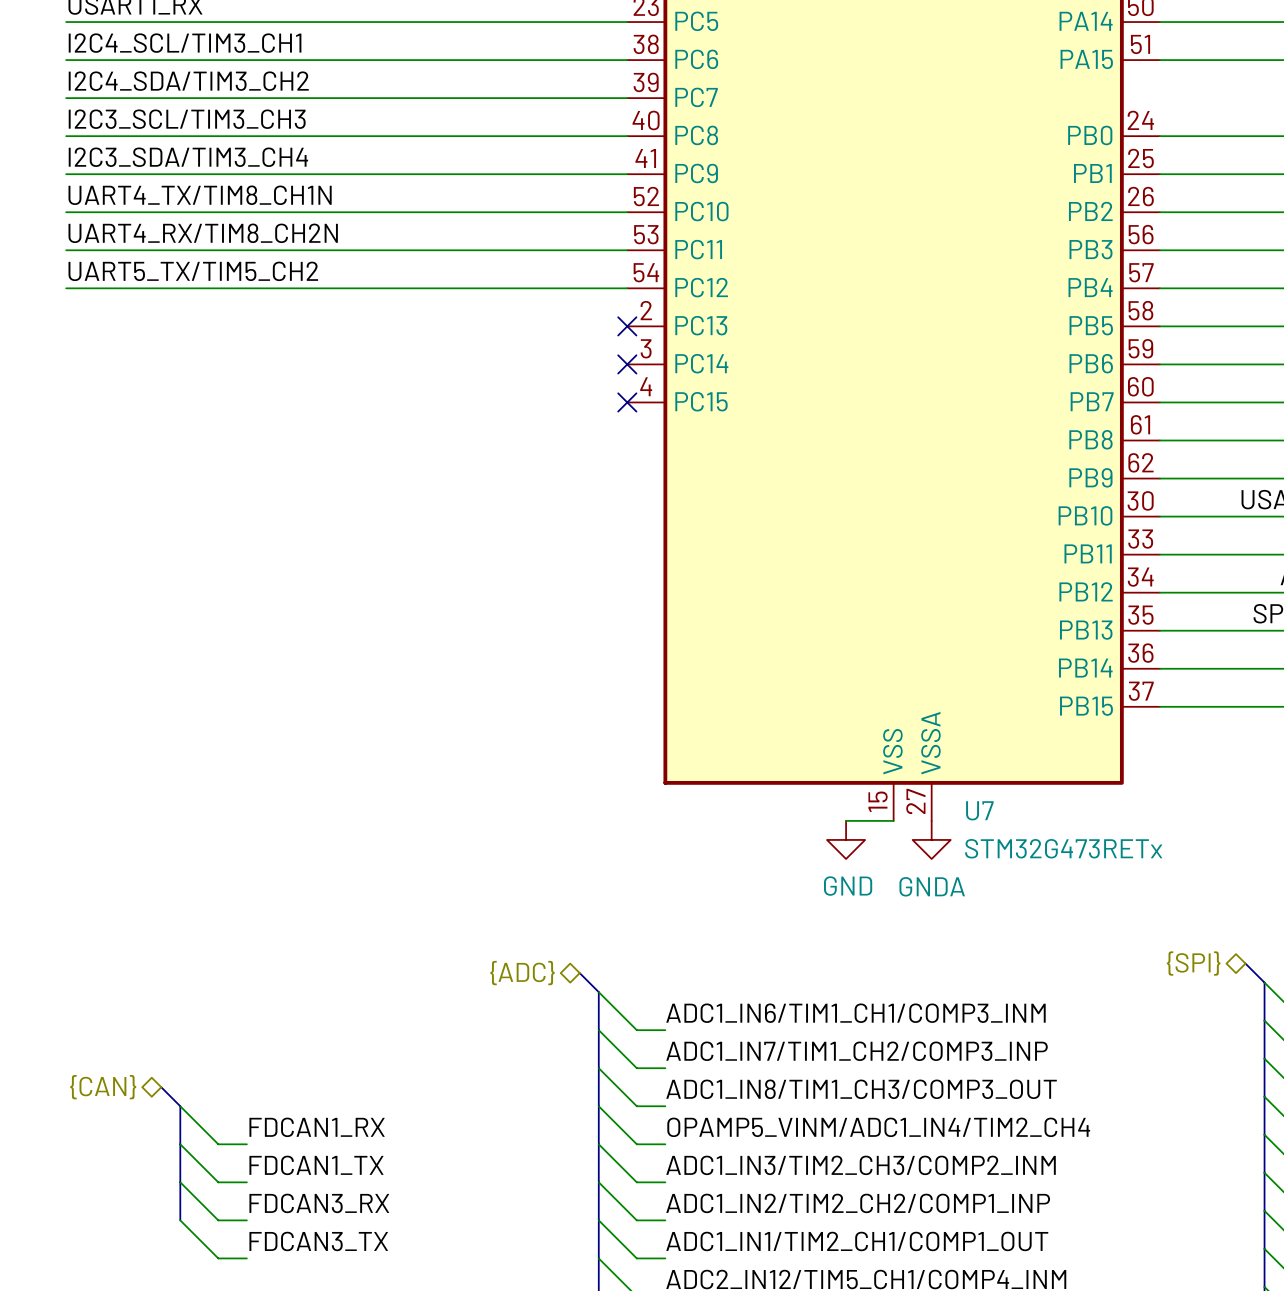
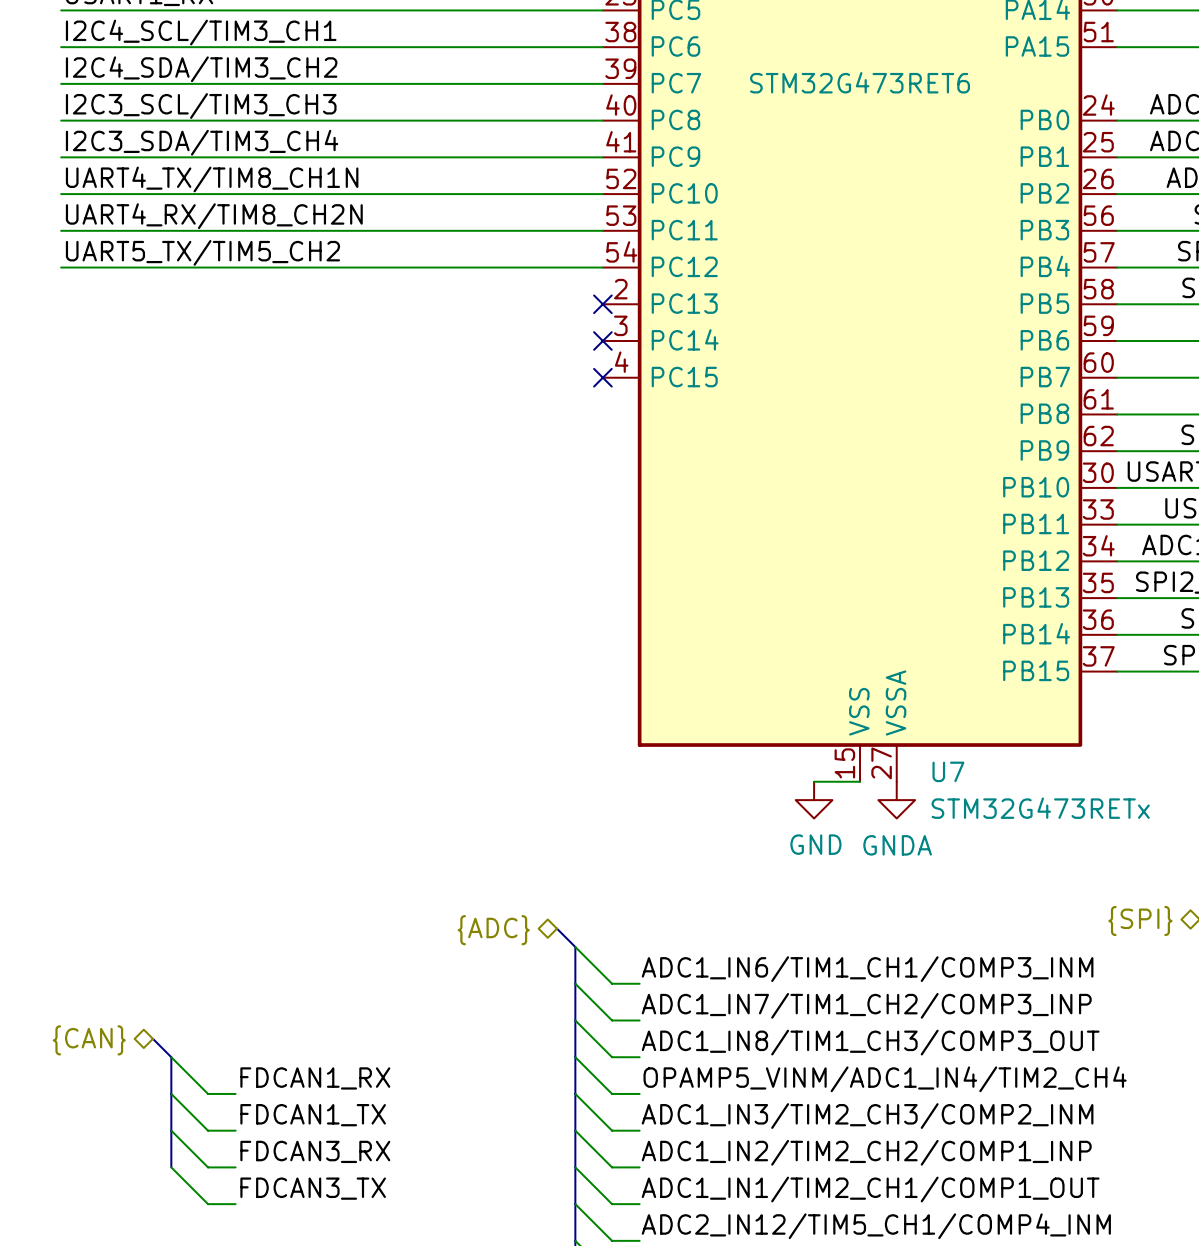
U7 text: none -> STM32G473RET6 (860, 82)

